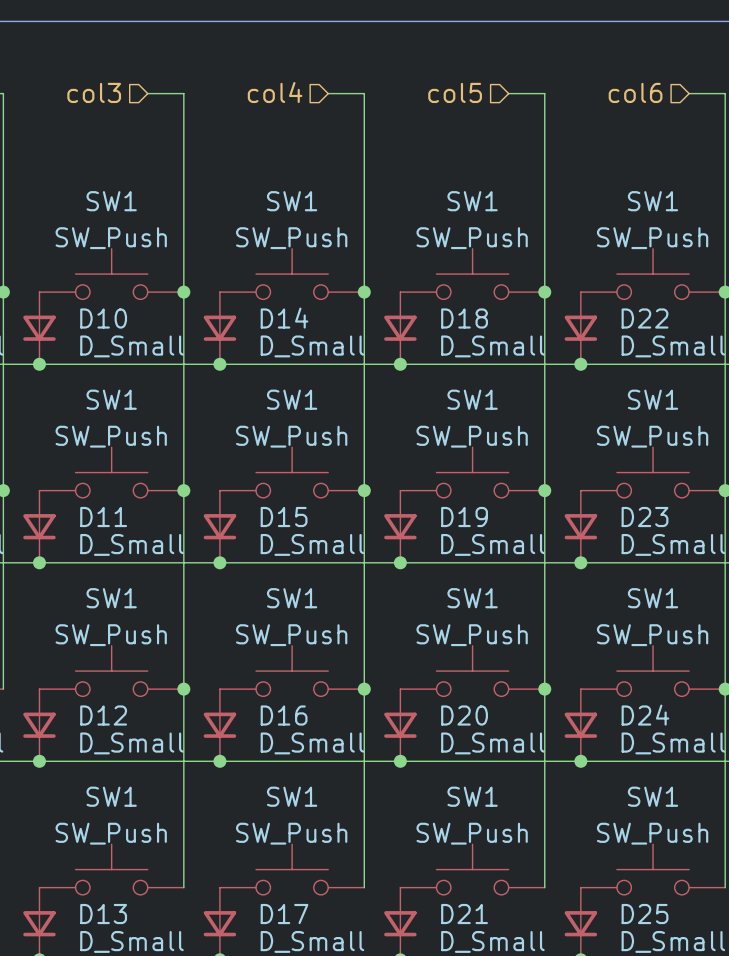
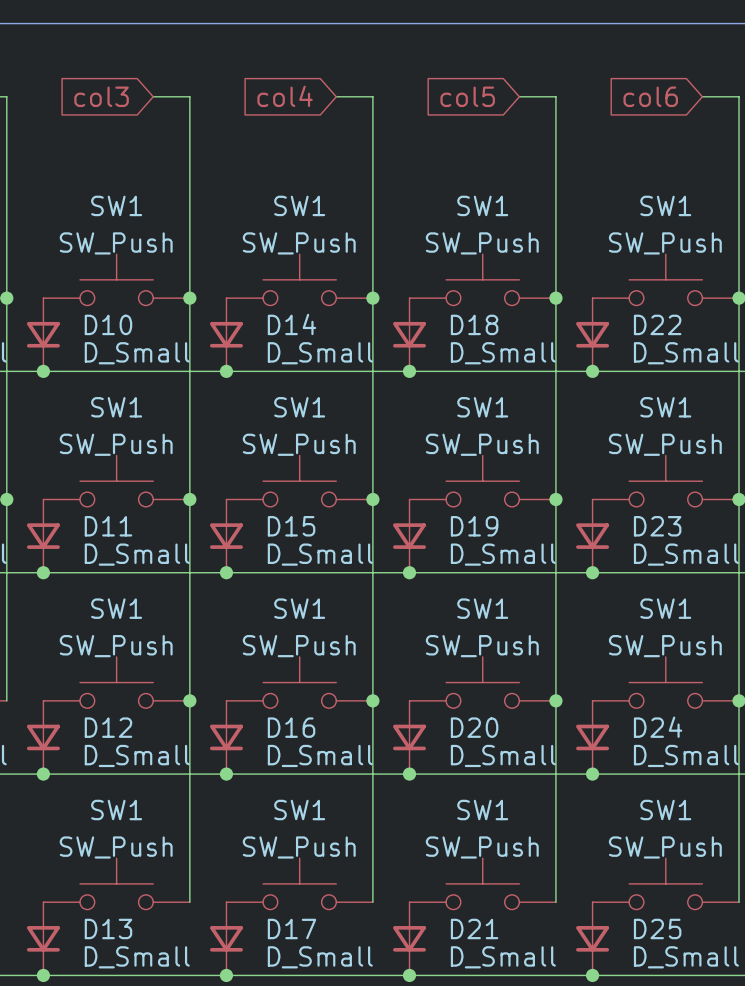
hierarchical label: col3 (94, 92) -> none
hierarchical label: col4 (275, 92) -> none
hierarchical label: col5 (455, 92) -> none
hierarchical label: col6 (635, 92) -> none
global label: none -> col3 (101, 96)
global label: none -> col4 (285, 96)
global label: none -> col5 (467, 96)
global label: none -> col6 (650, 96)

